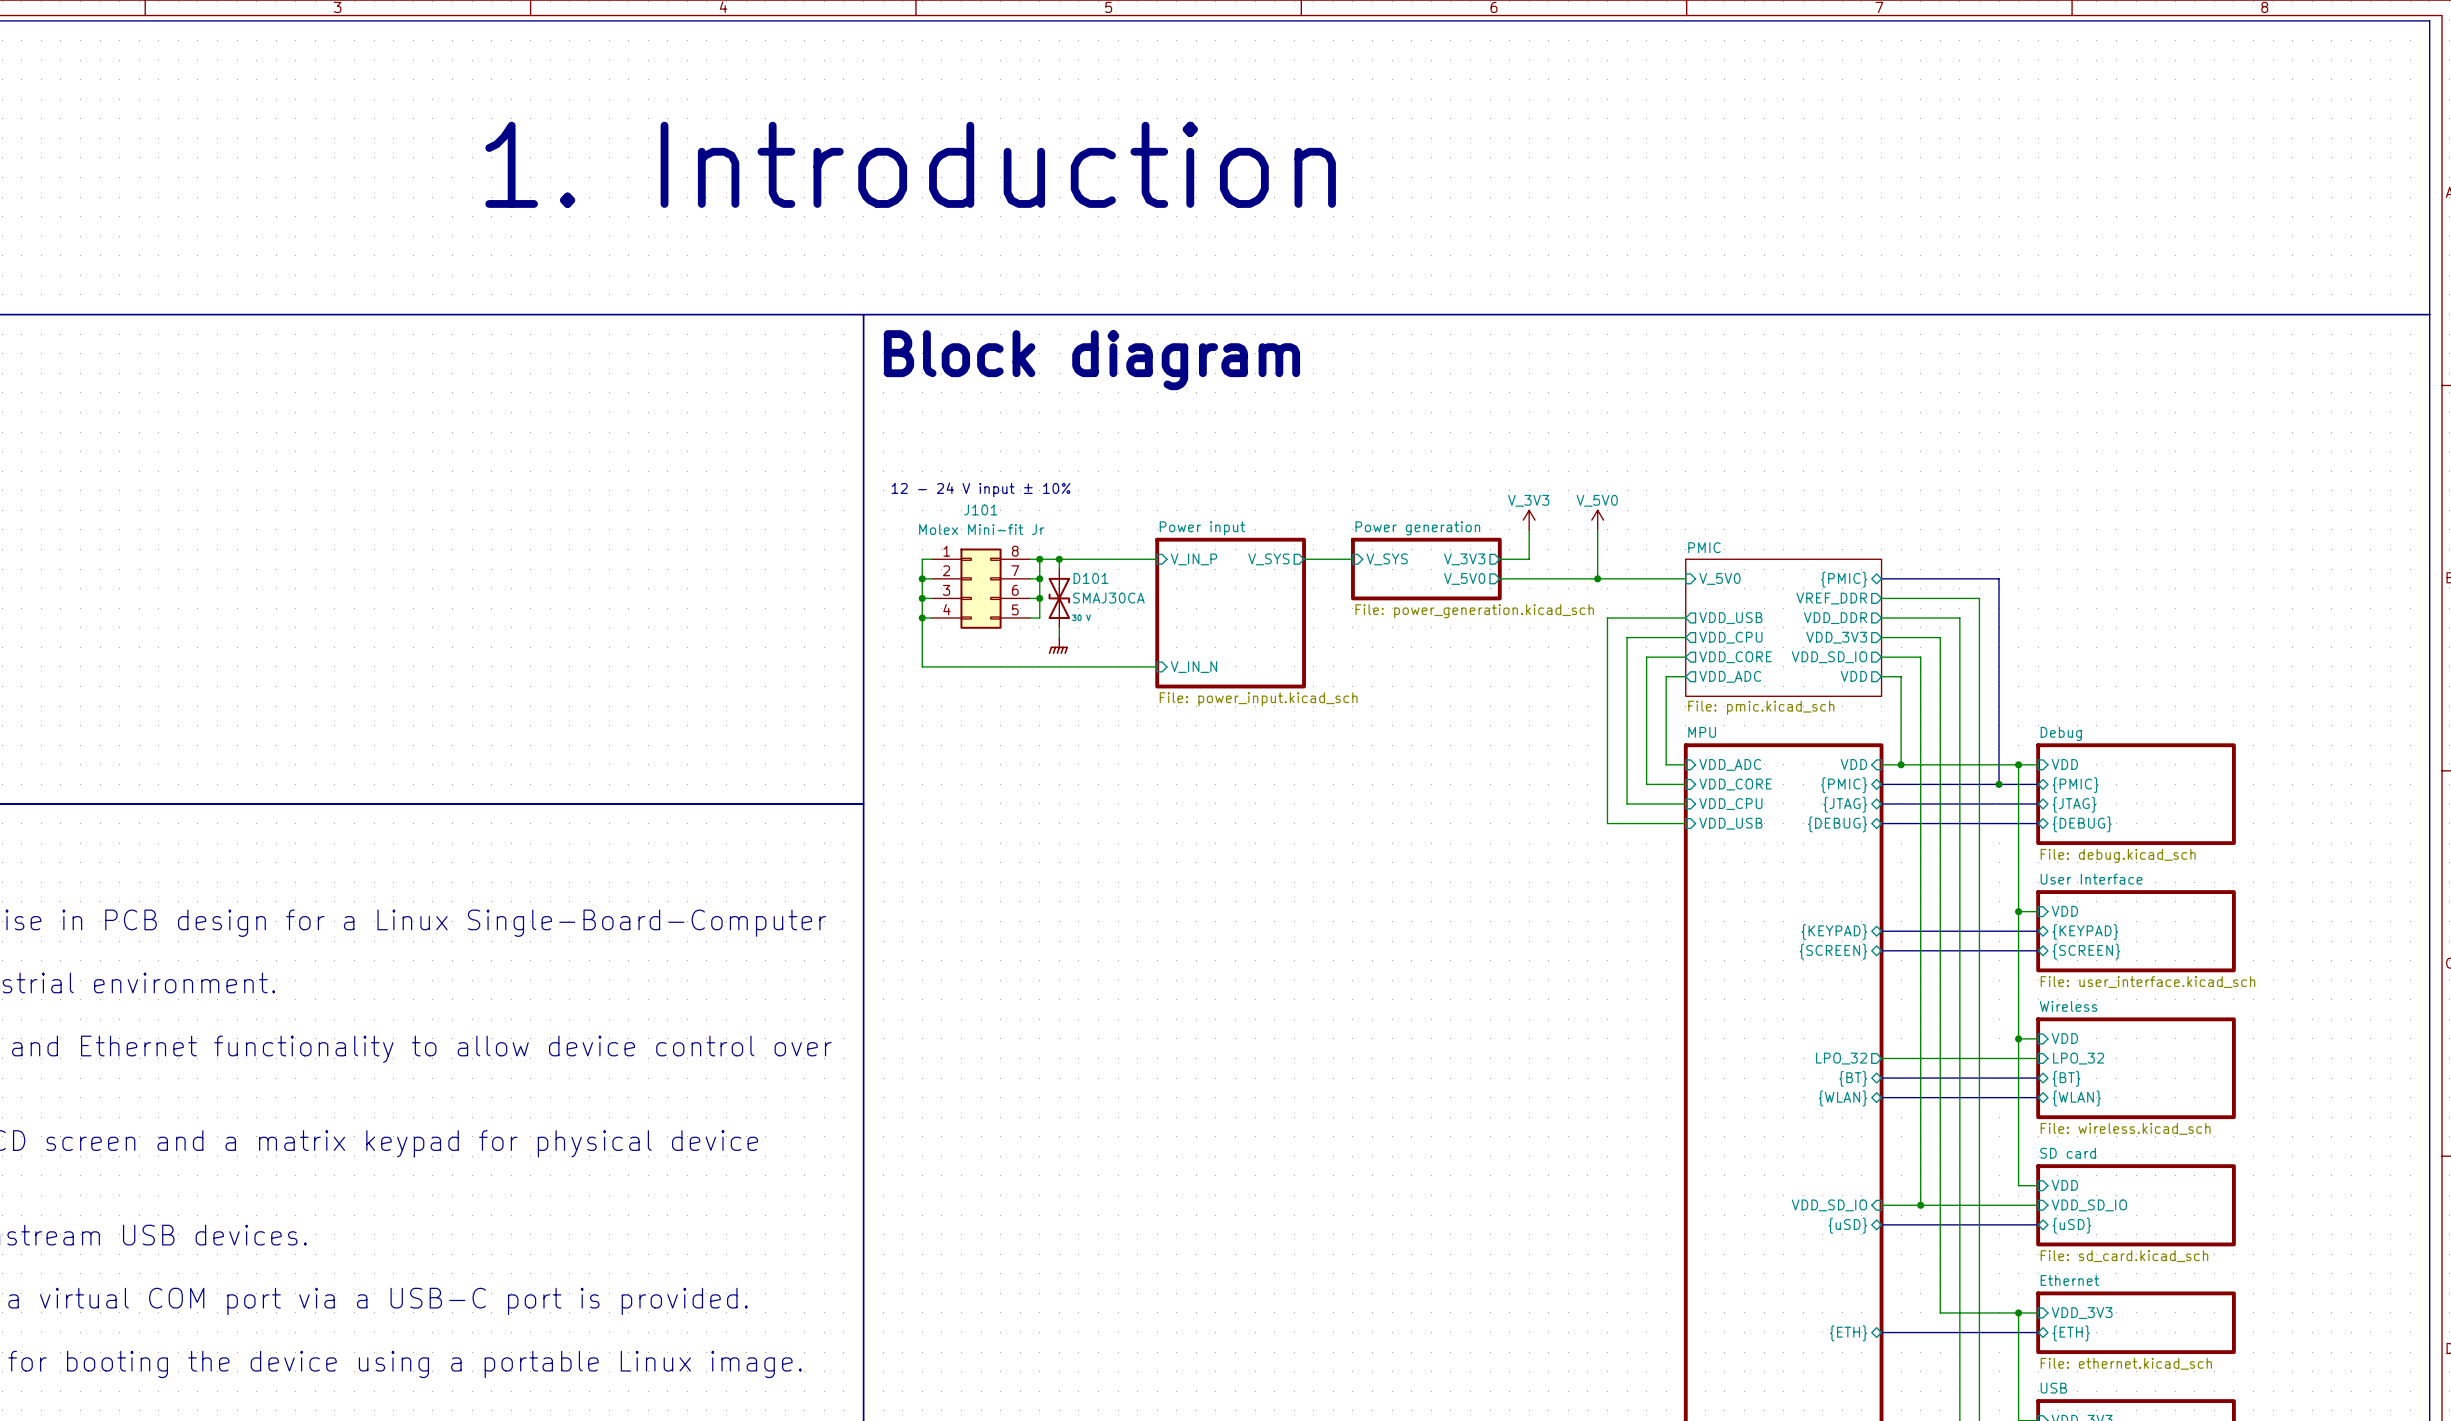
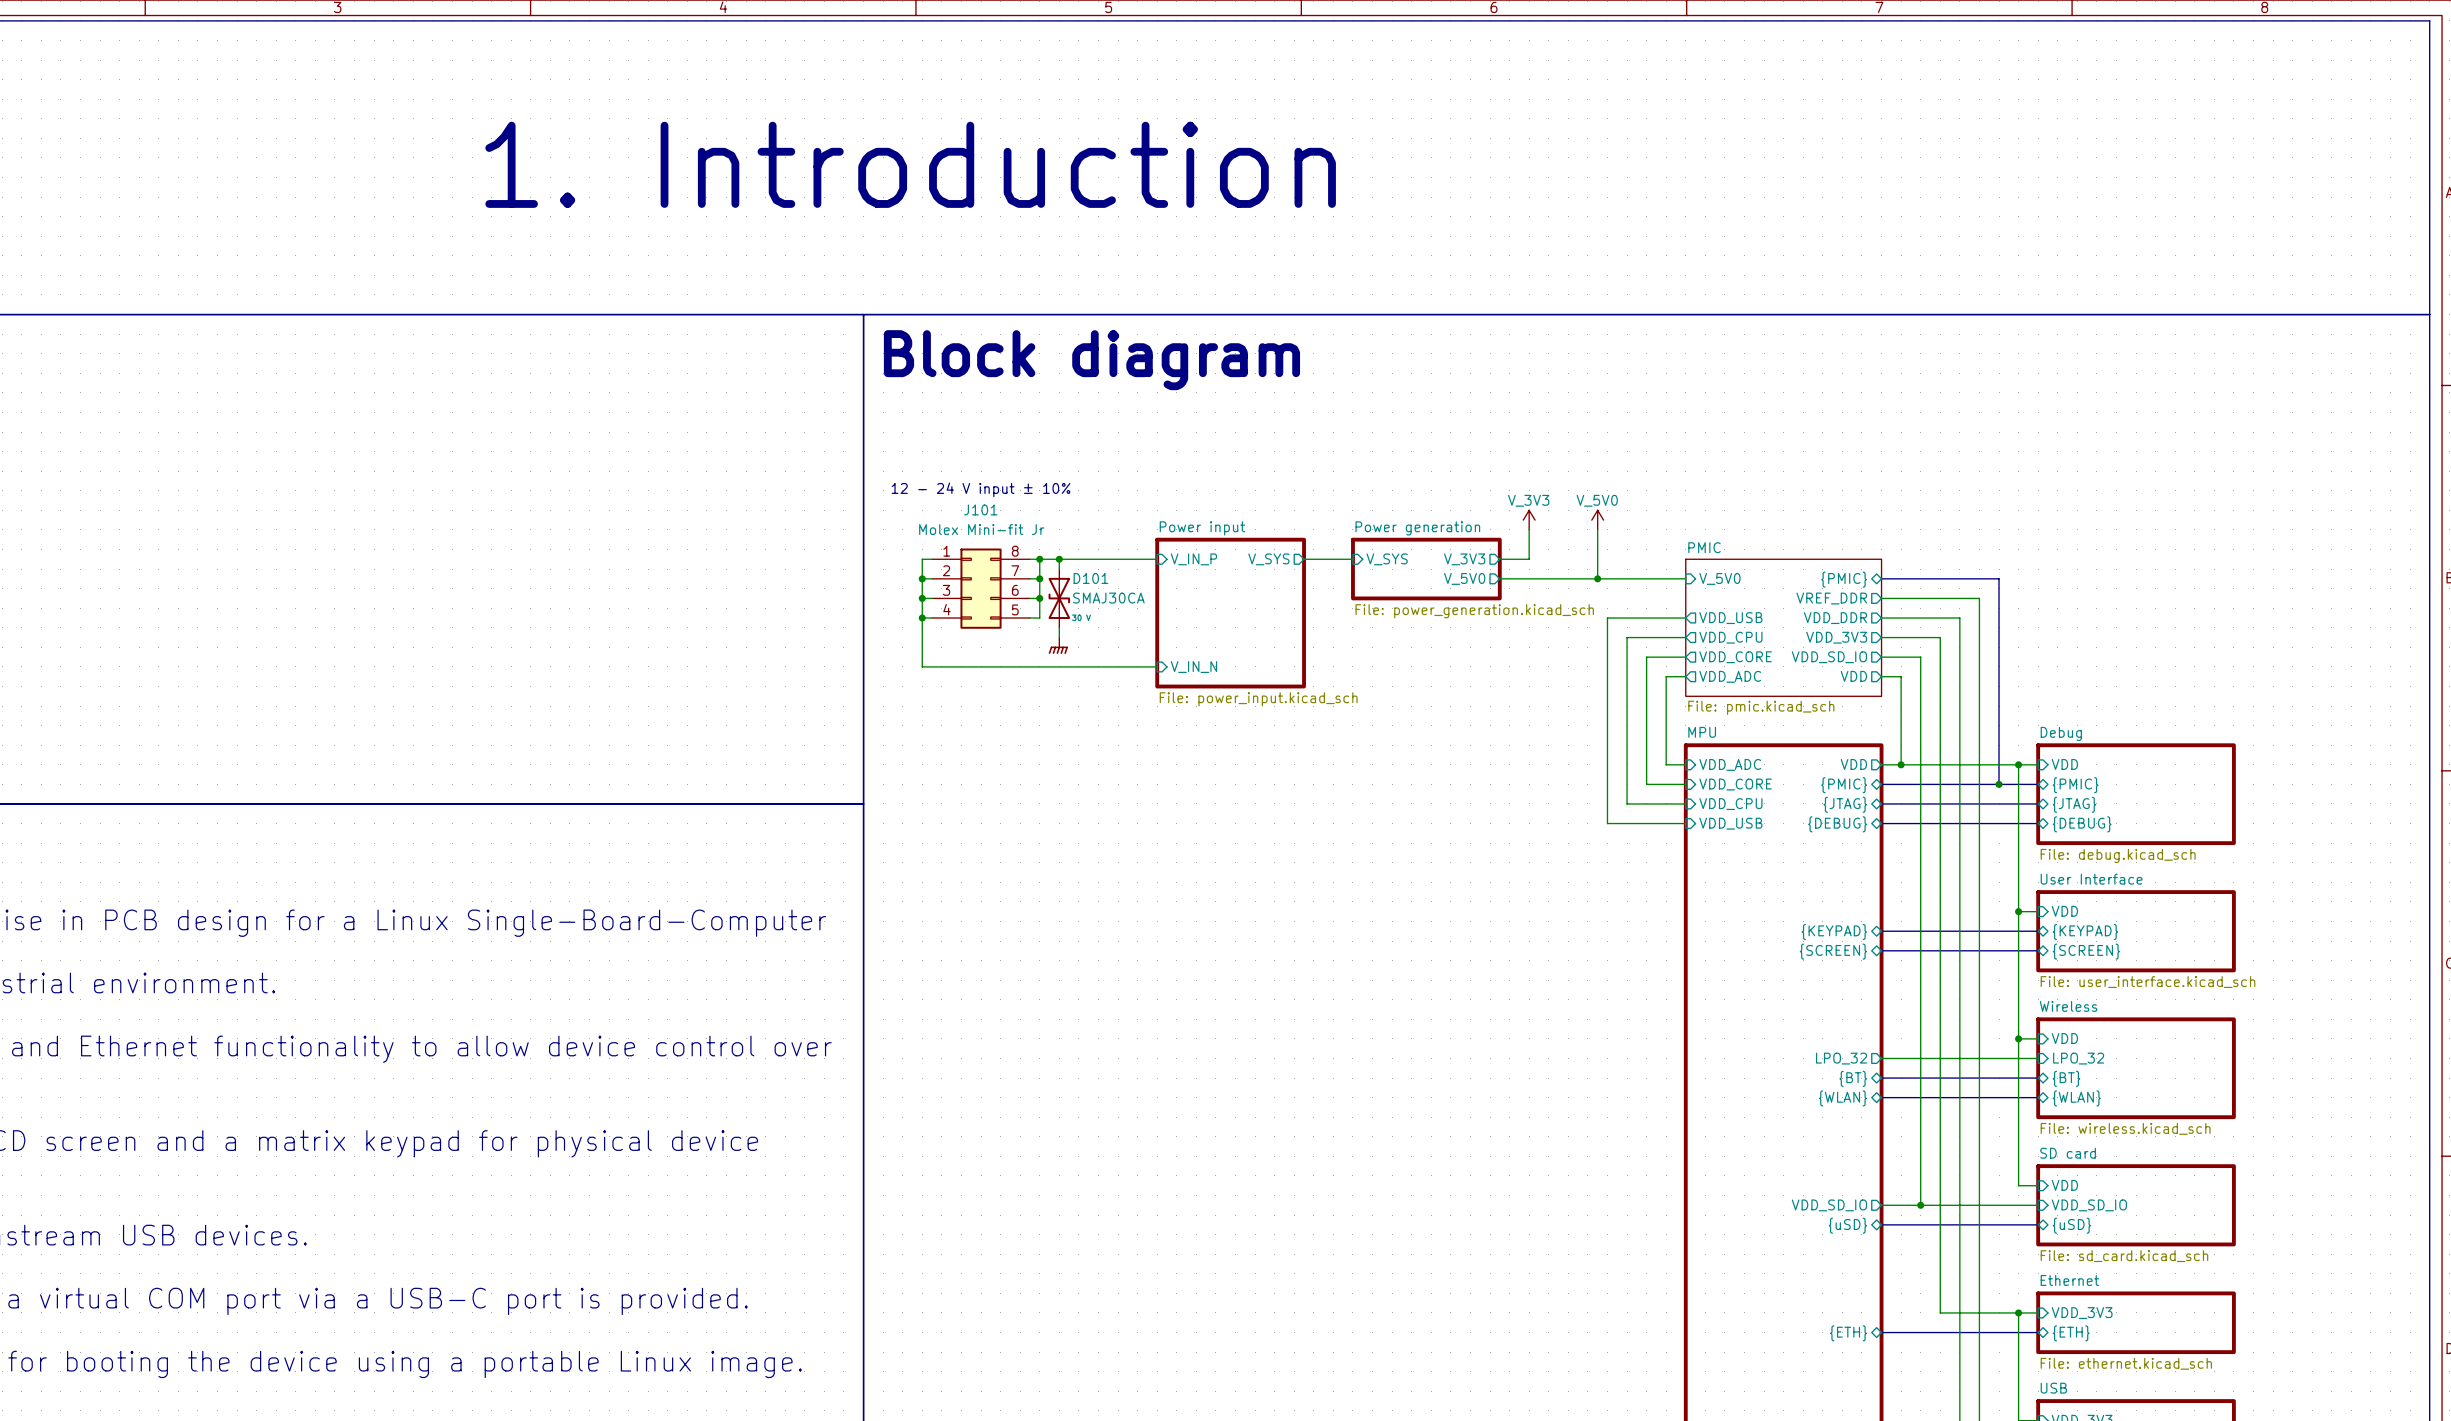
sheet pin shape: input (1853, 764) -> output (1853, 764)
sheet pin shape: input (1829, 1205) -> output (1829, 1205)

